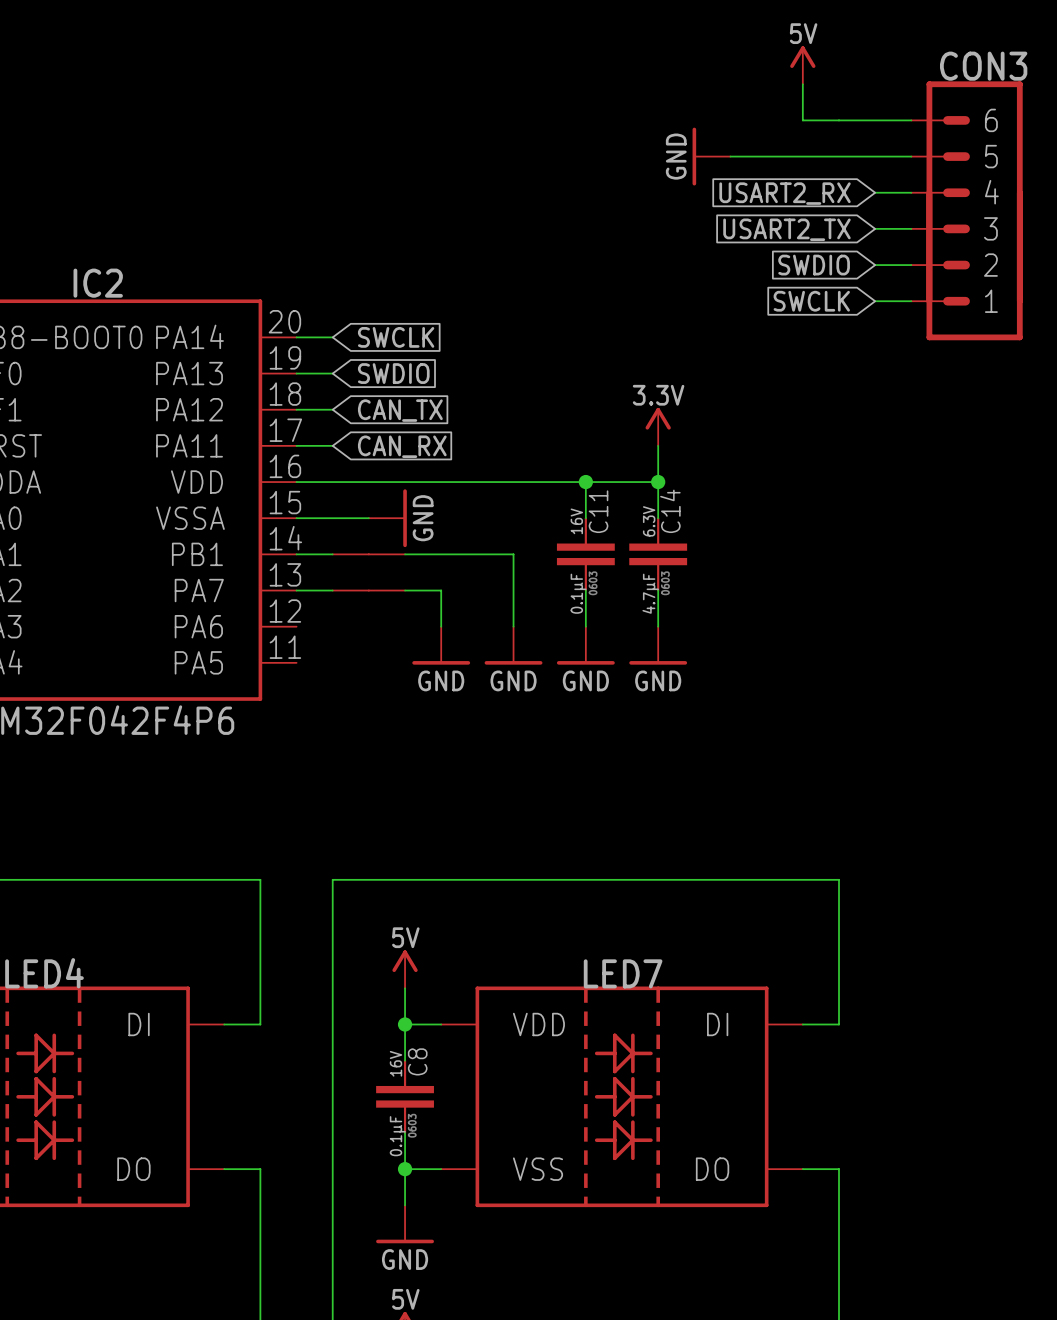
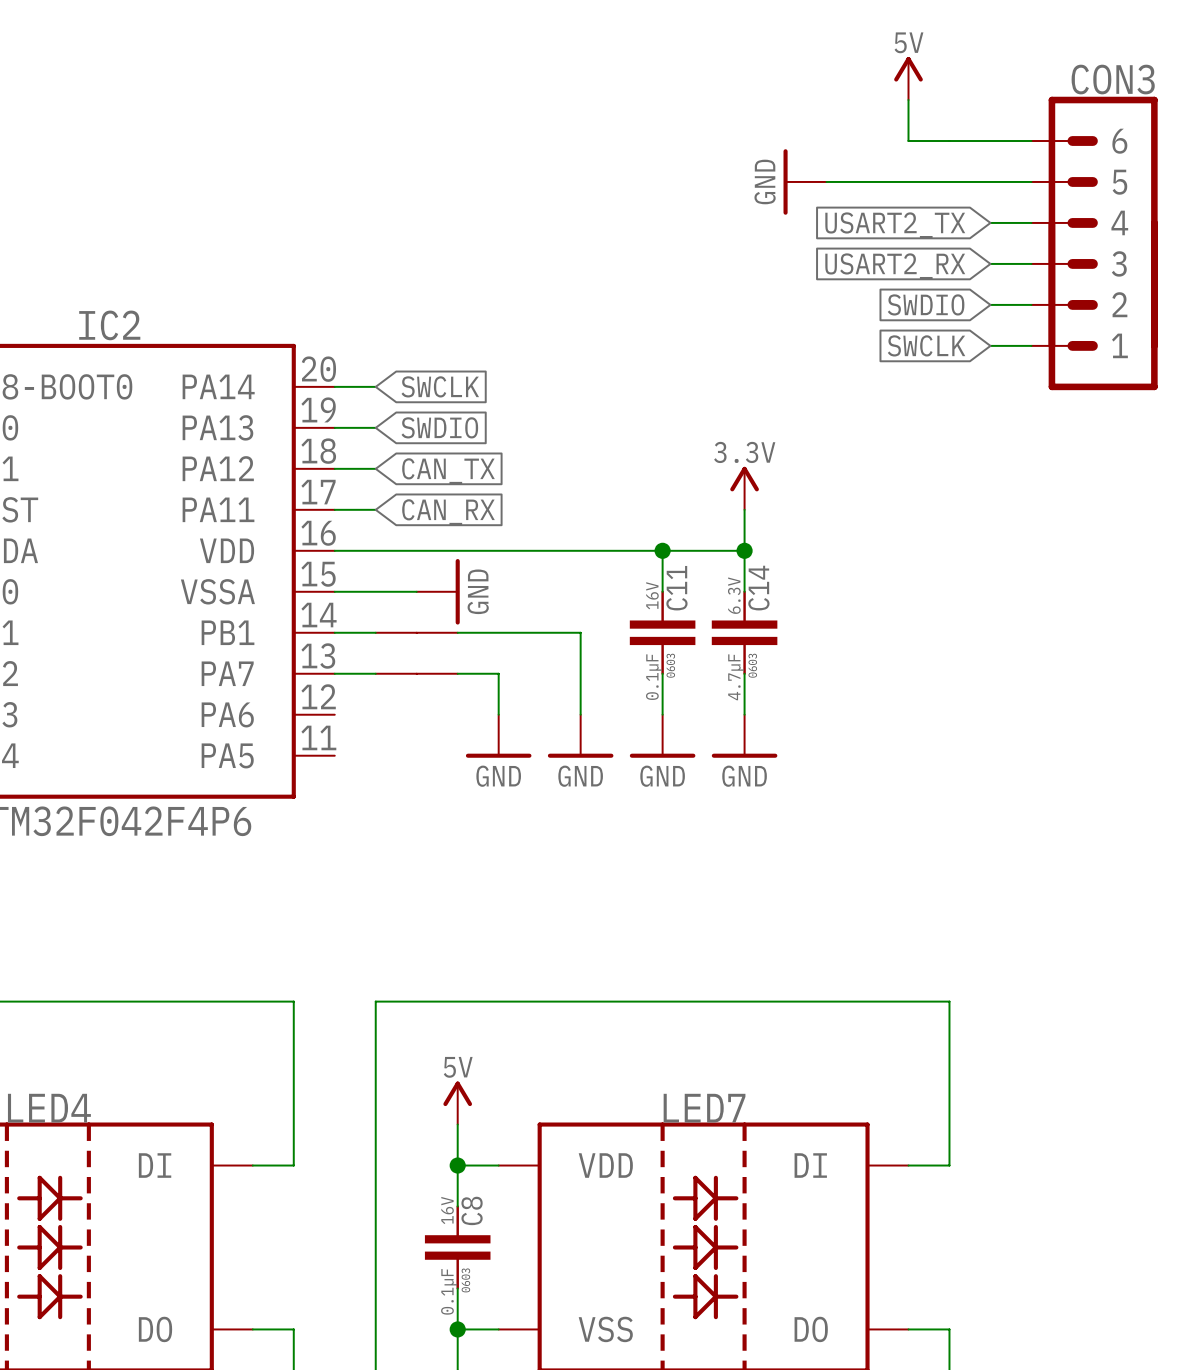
global label: USART2_RX (785, 193) -> USART2_TX (895, 225)
global label: USART2_TX (786, 229) -> USART2_RX (895, 266)

